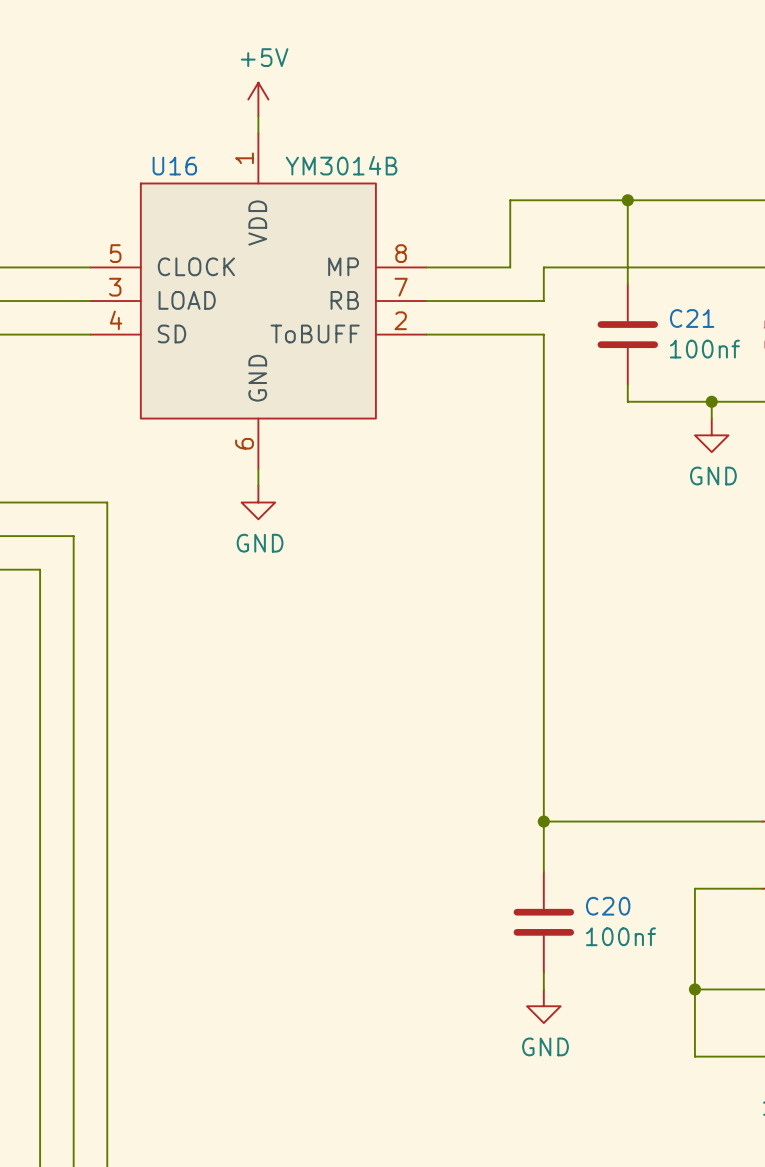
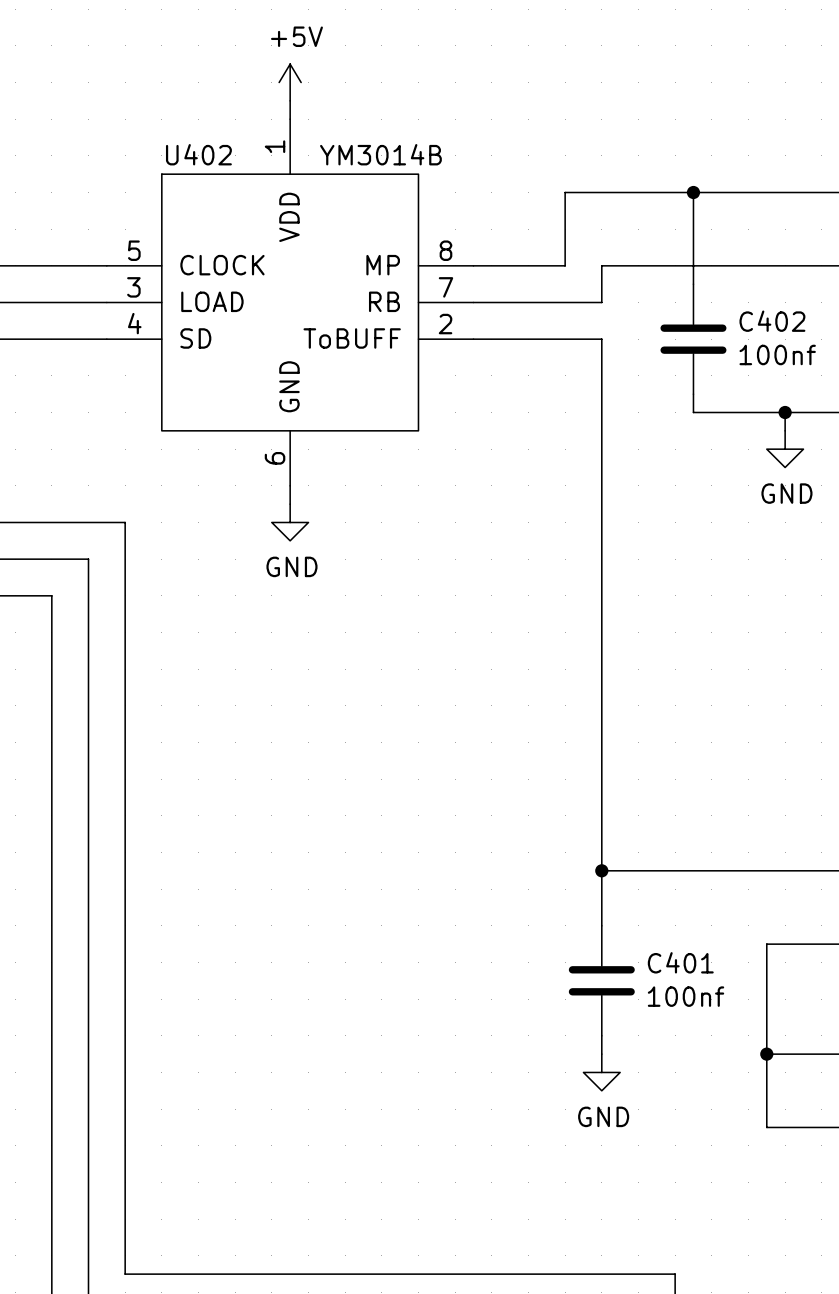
U16 name: U16 (174, 166) -> U402 (198, 154)
C21 name: C21 (692, 318) -> C402 (772, 321)
C20 name: C20 (608, 906) -> C401 (680, 962)

